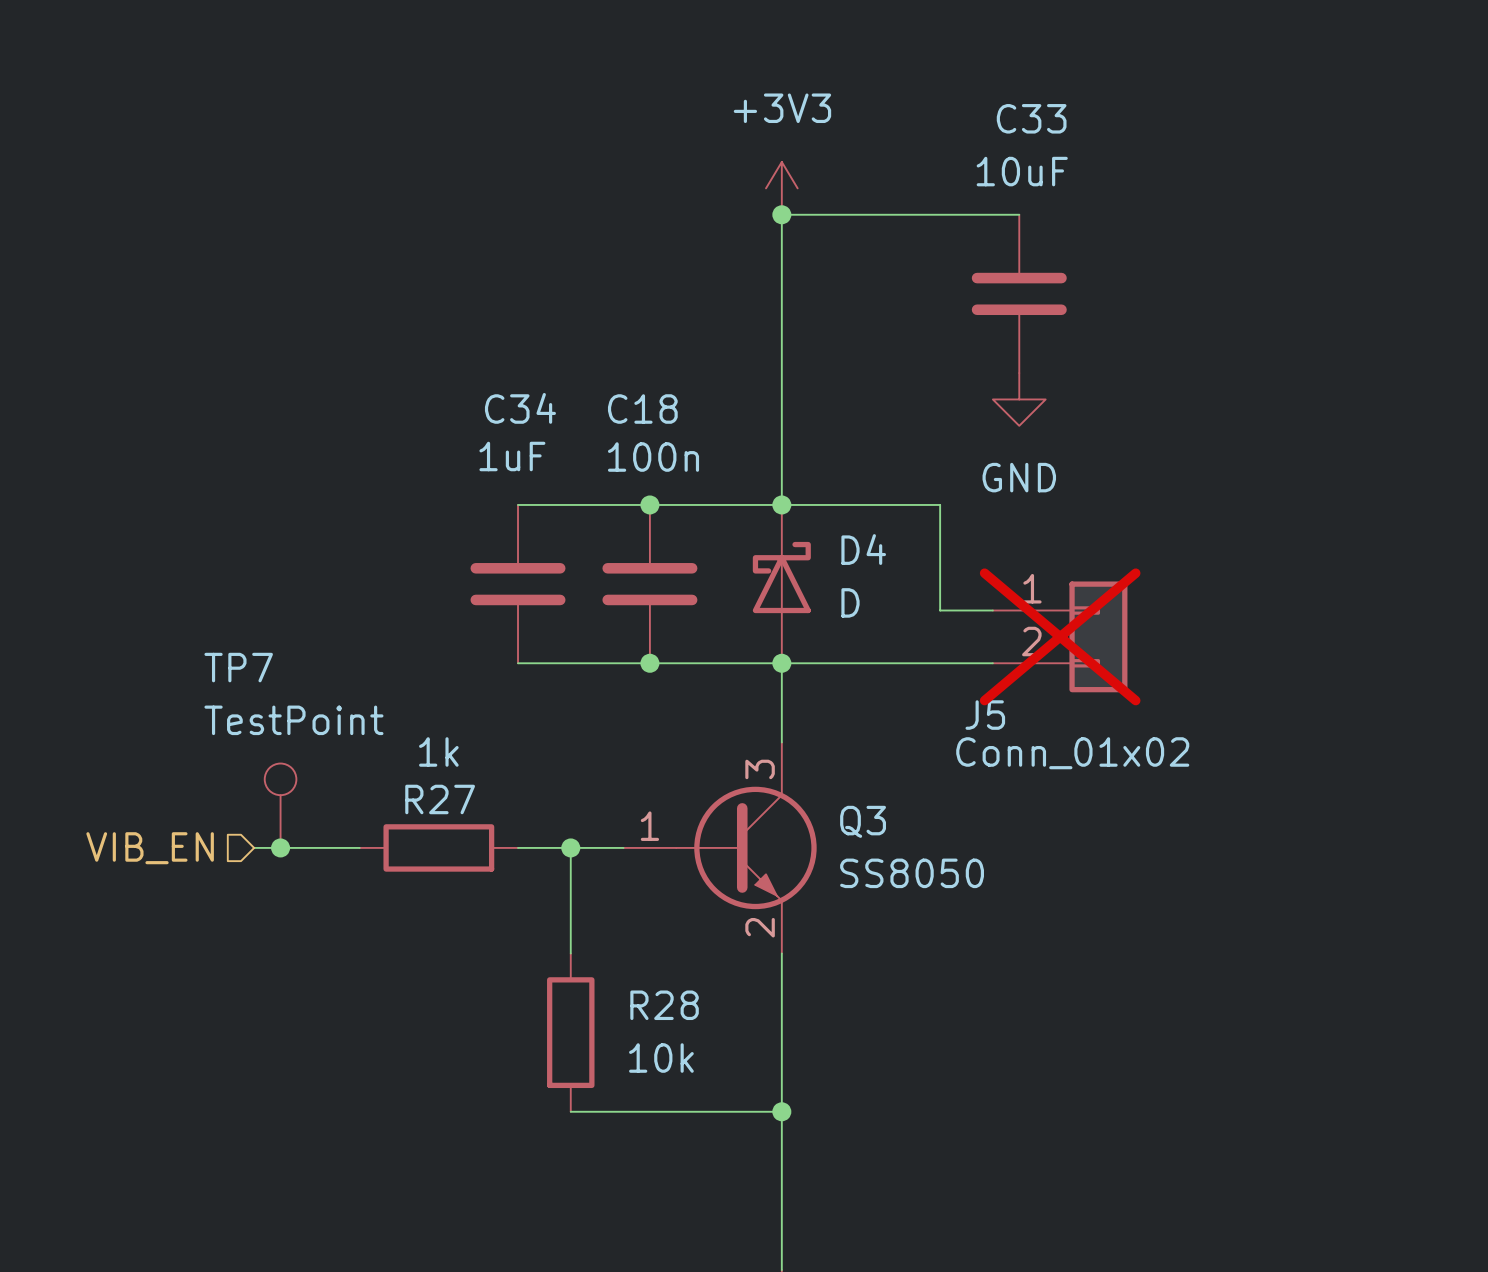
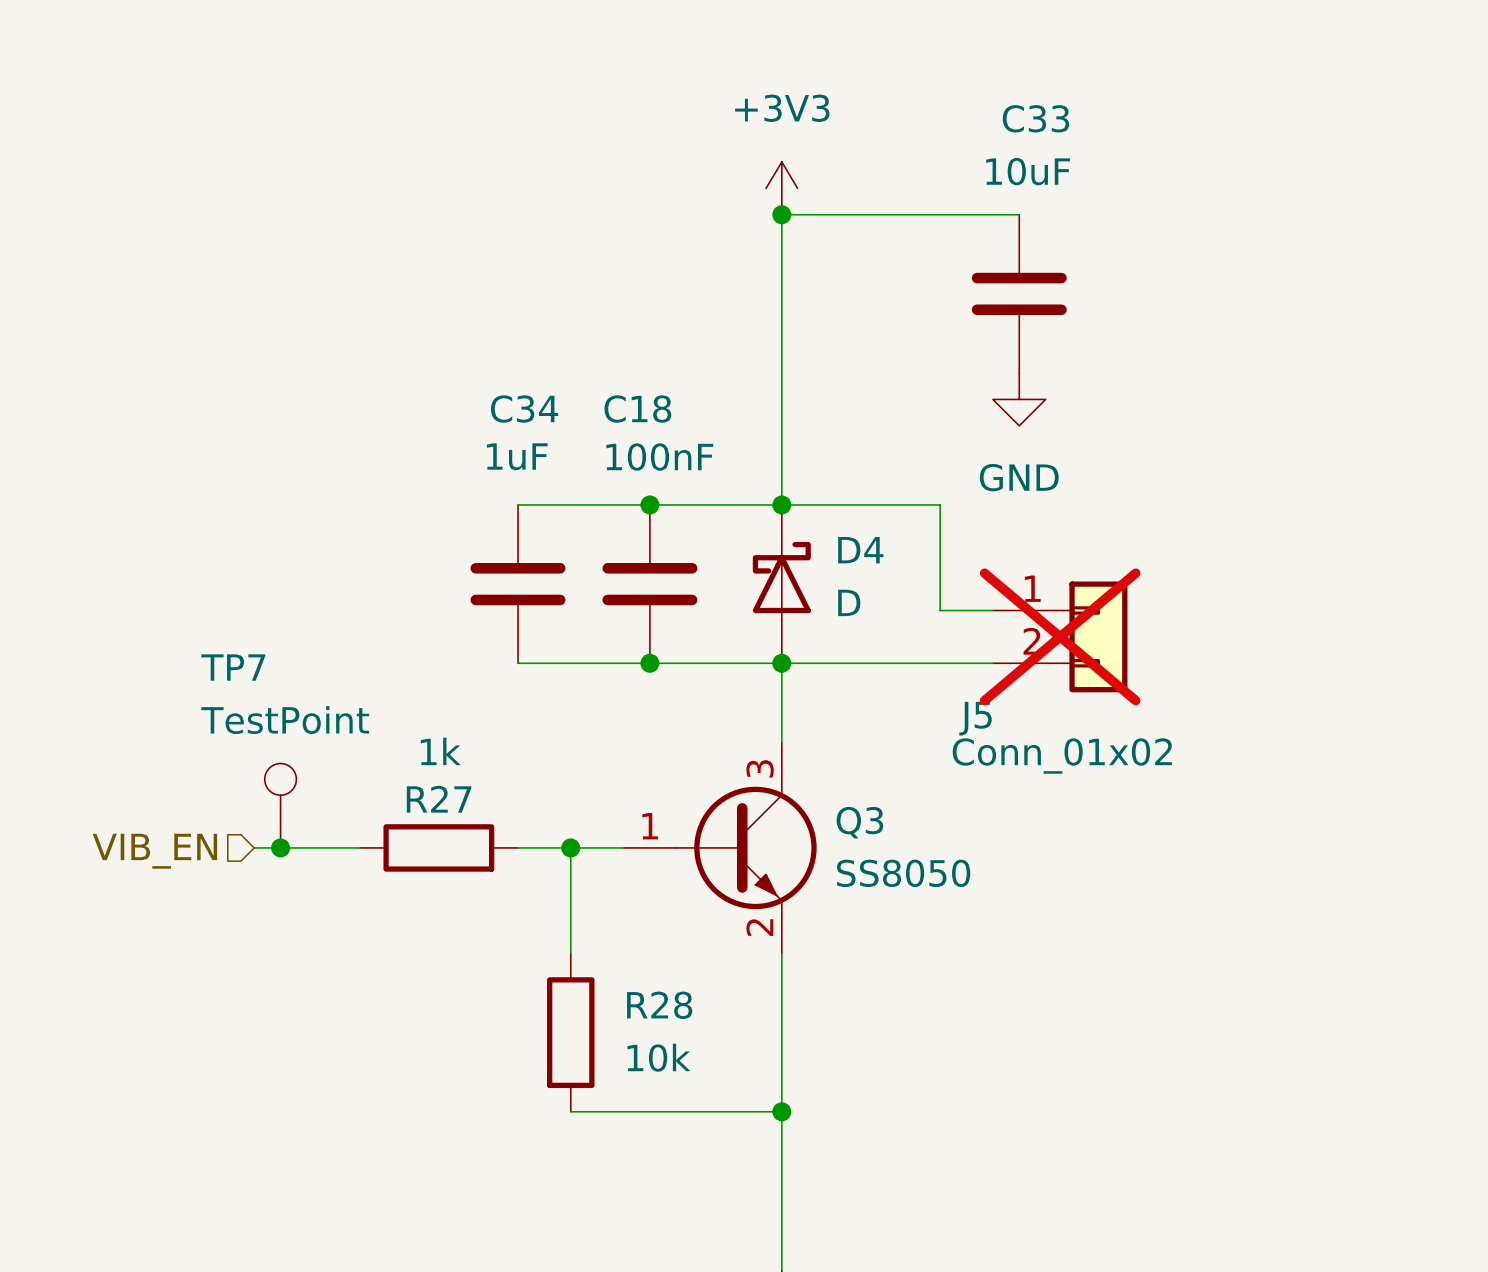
C18 value: 100n (653, 457) -> 100nF (659, 457)

